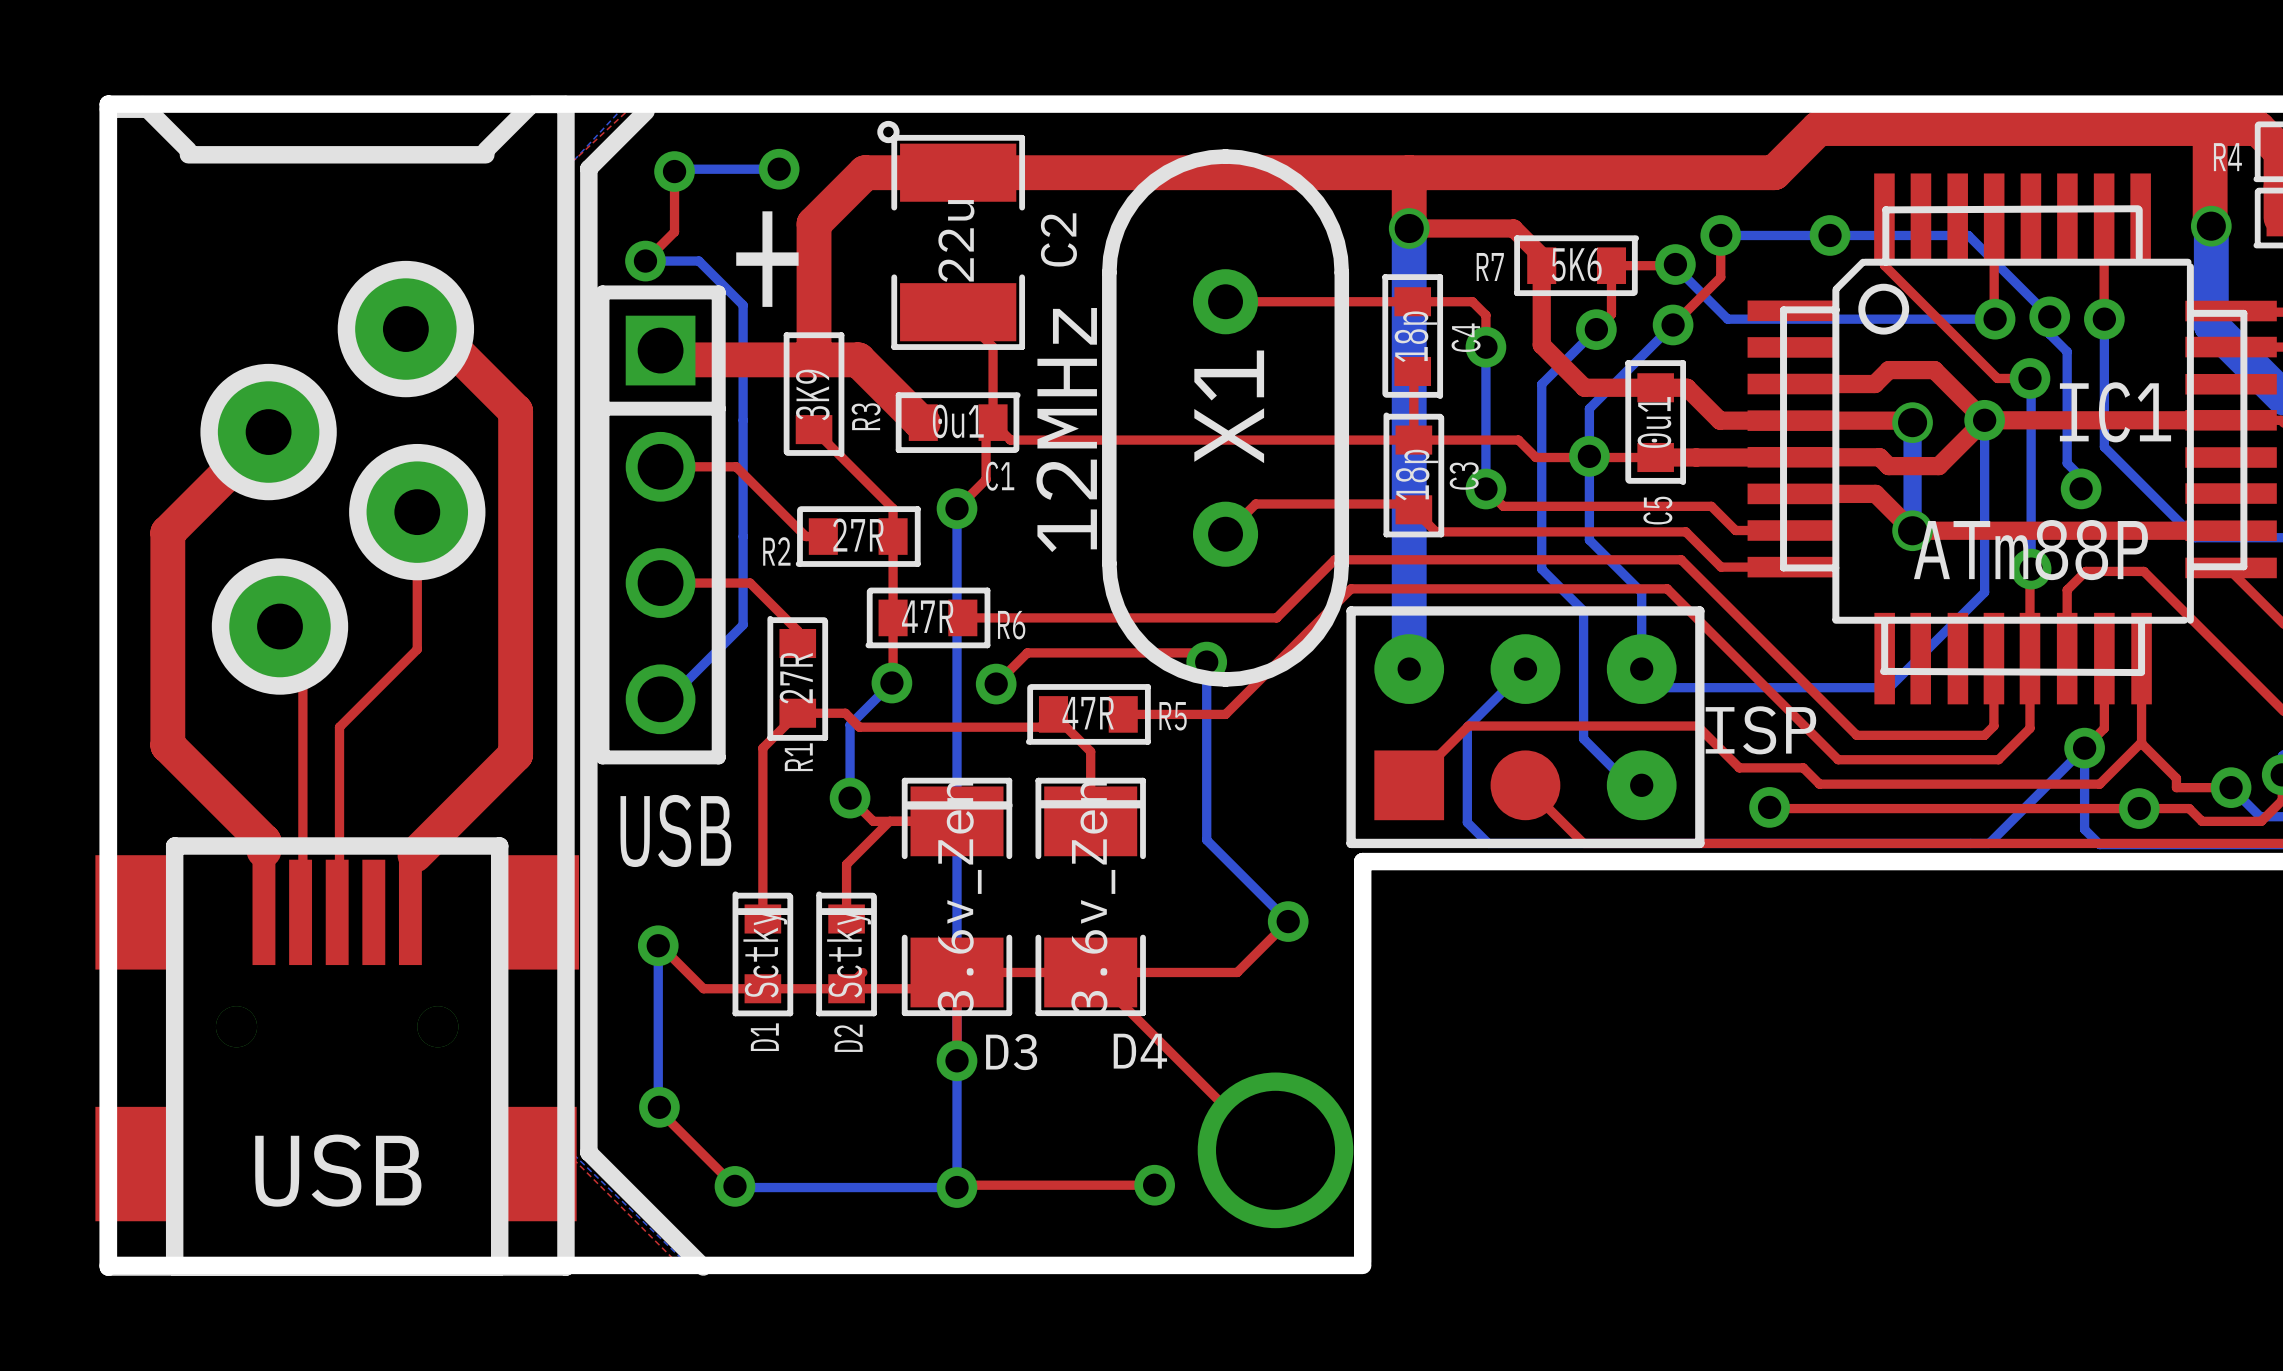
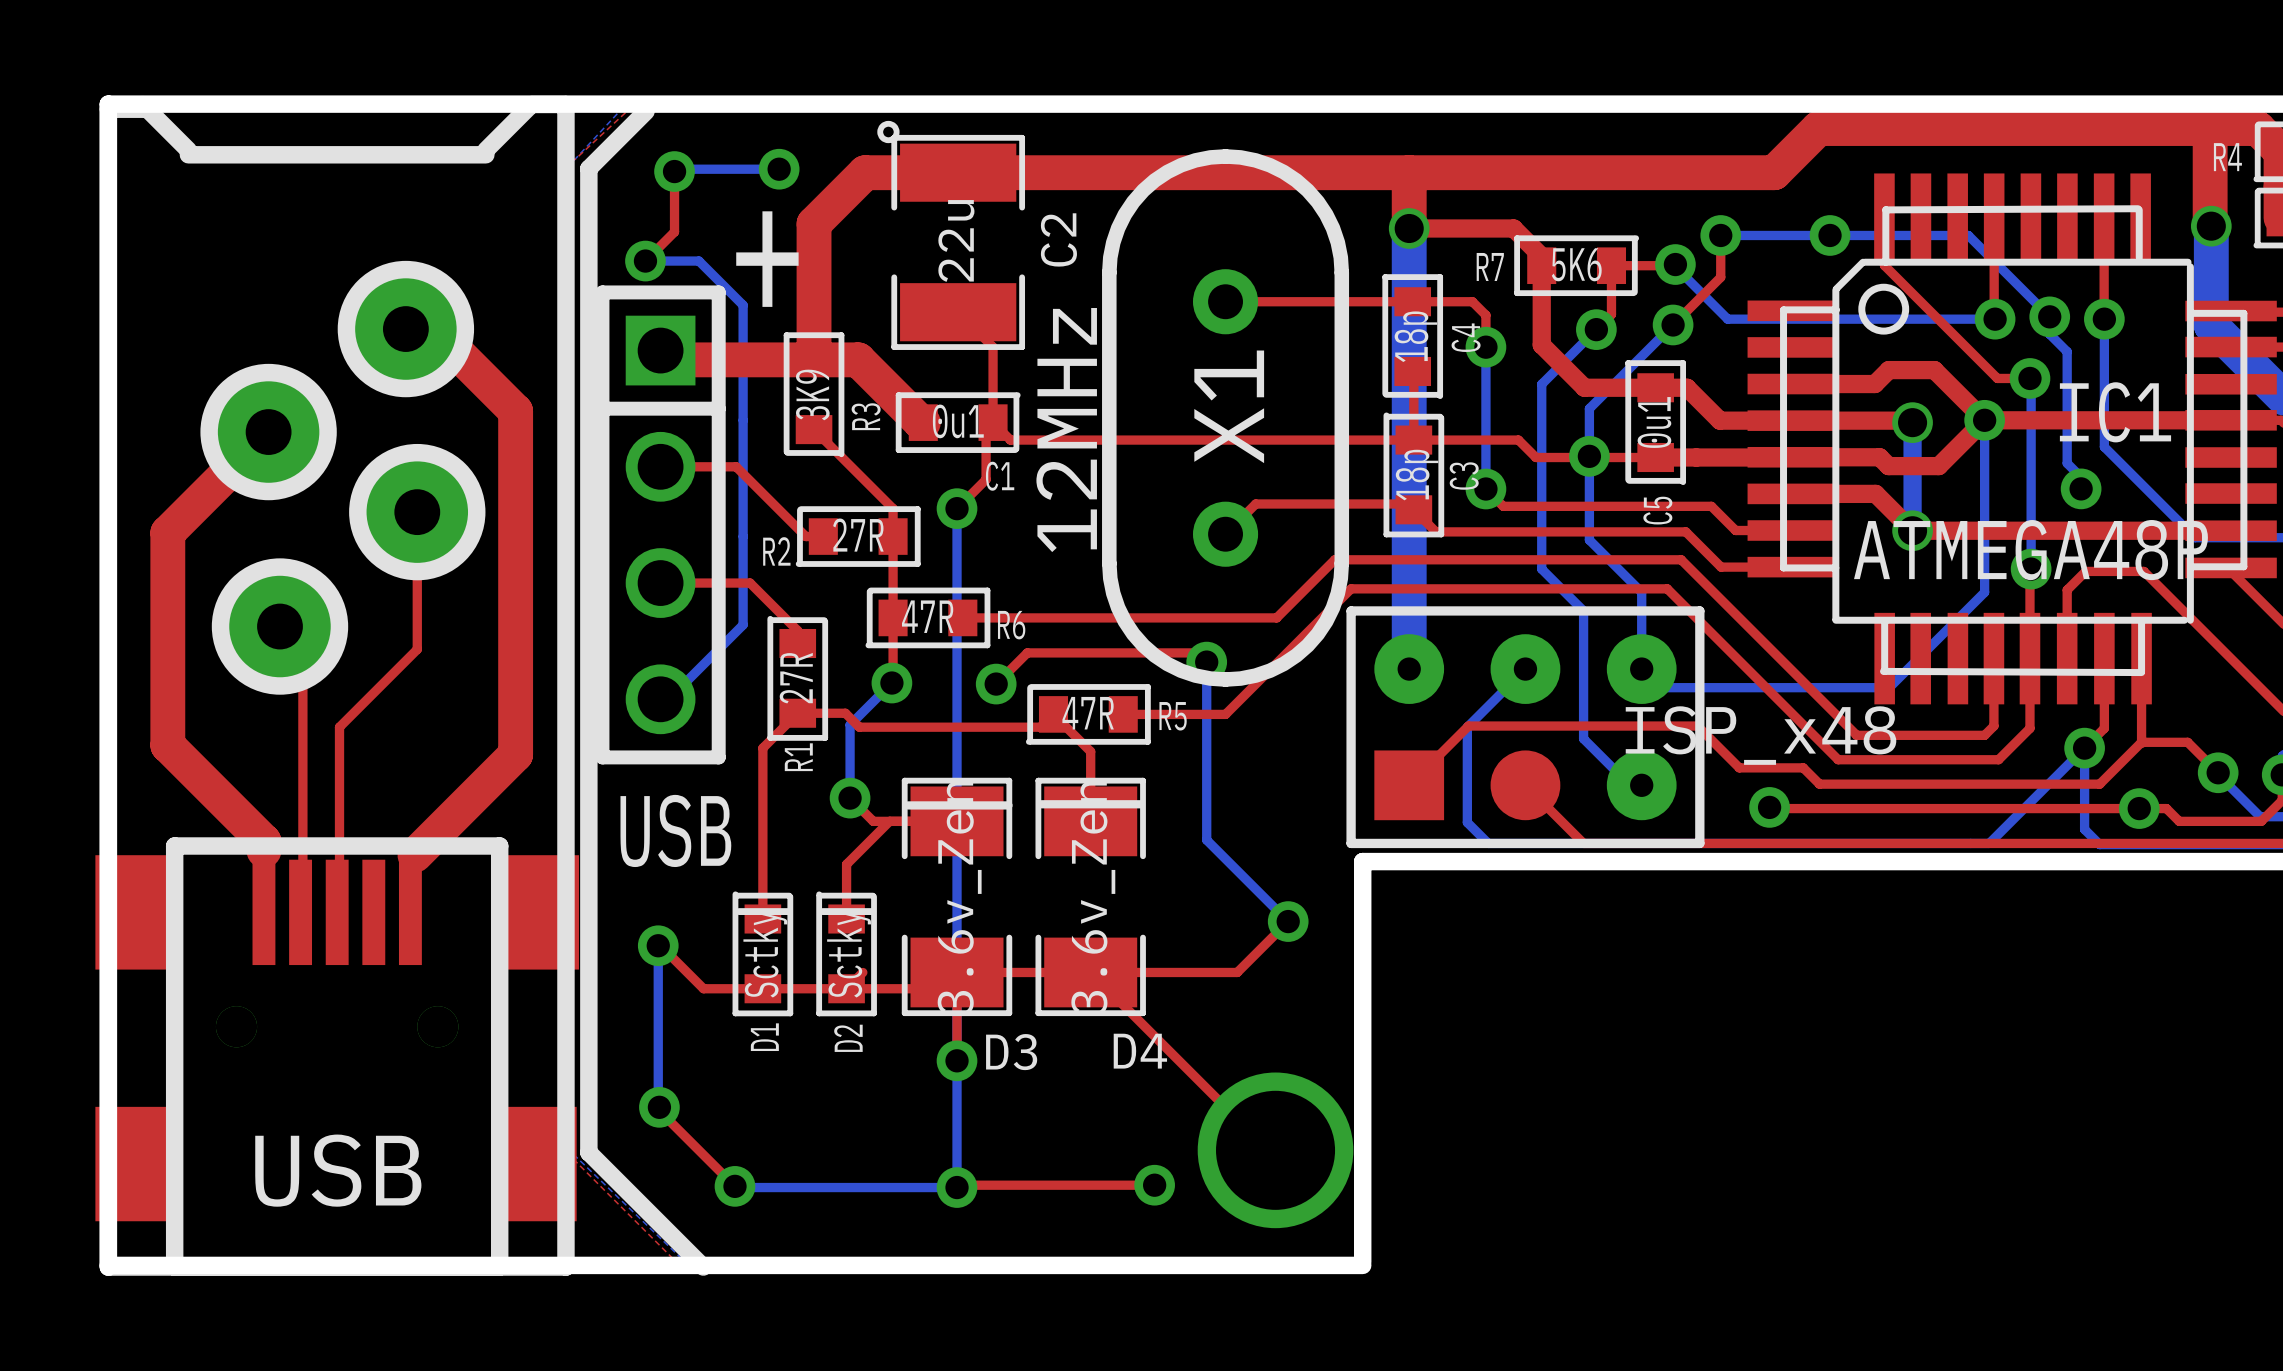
IC1 value: ATm88P (2030, 550) -> ATMEGA48P (2030, 550)
part value: ISP (1760, 730) -> ISP_x48 (1761, 735)
top track: (2141, 743) (2176, 778) (2176, 787) (2231, 787) -> (2141, 742) (2187, 742) (2218, 772)
via position: (2231, 787) -> (2218, 772)
top track: (2166, 808) (2189, 808) (2202, 821) -> (2166, 808) (2179, 821) (2202, 821)

